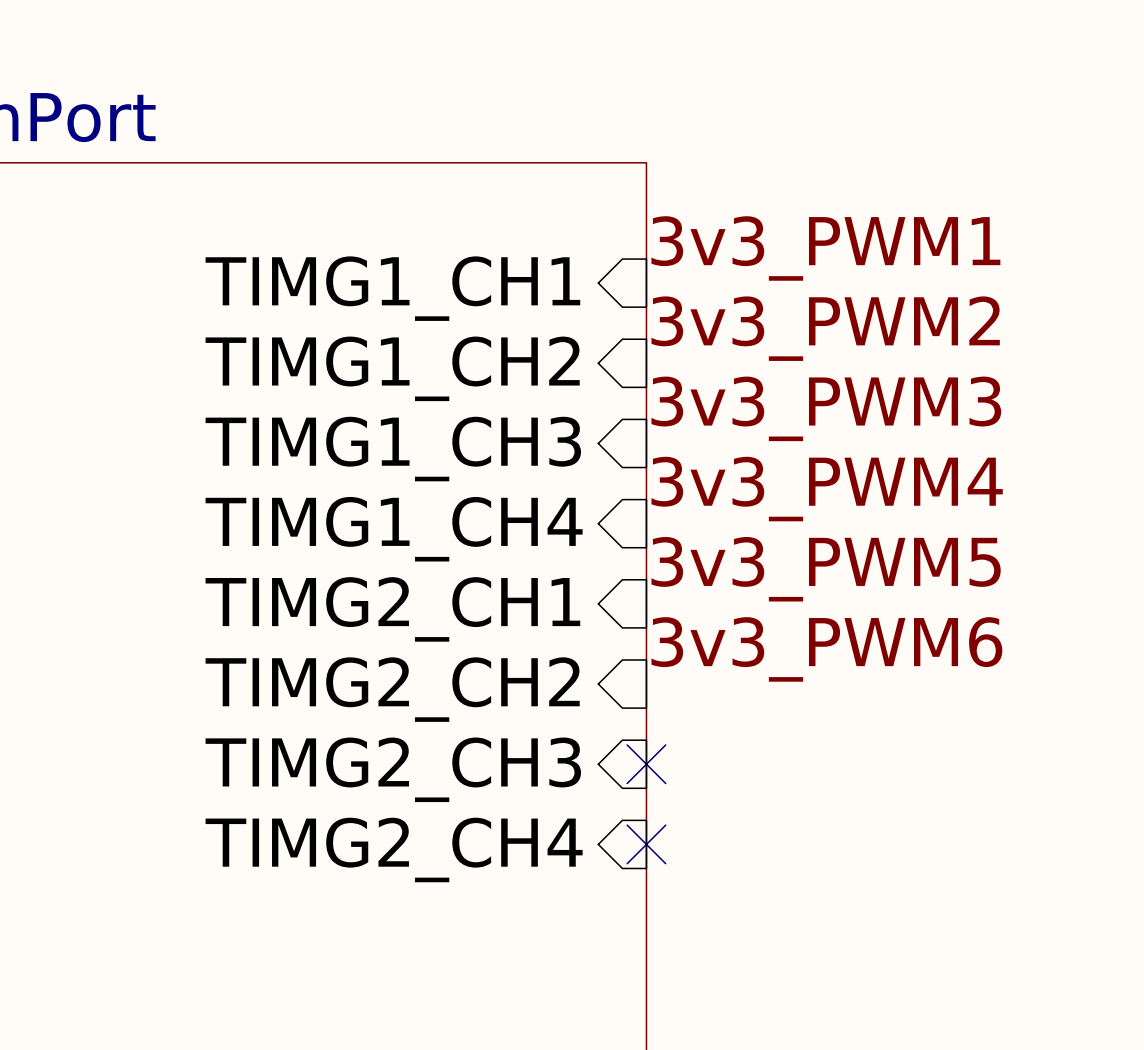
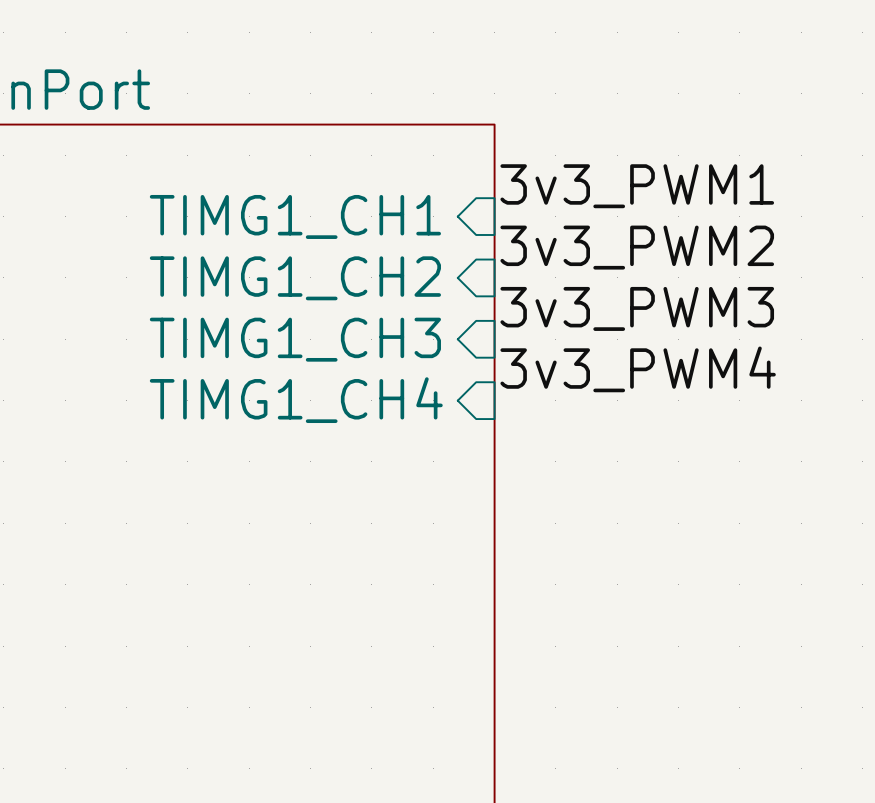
label: 3v3_PWM5 (826, 569) -> none
sheet pin: TIMG2_CH1 (392, 609) -> none
label: 3v3_PWM6 (826, 649) -> none
sheet pin: TIMG2_CH2 (392, 689) -> none
no-connect mark: (646, 764) -> none
sheet pin: TIMG2_CH3 (393, 769) -> none
no-connect mark: (646, 844) -> none
sheet pin: TIMG2_CH4 (394, 849) -> none

